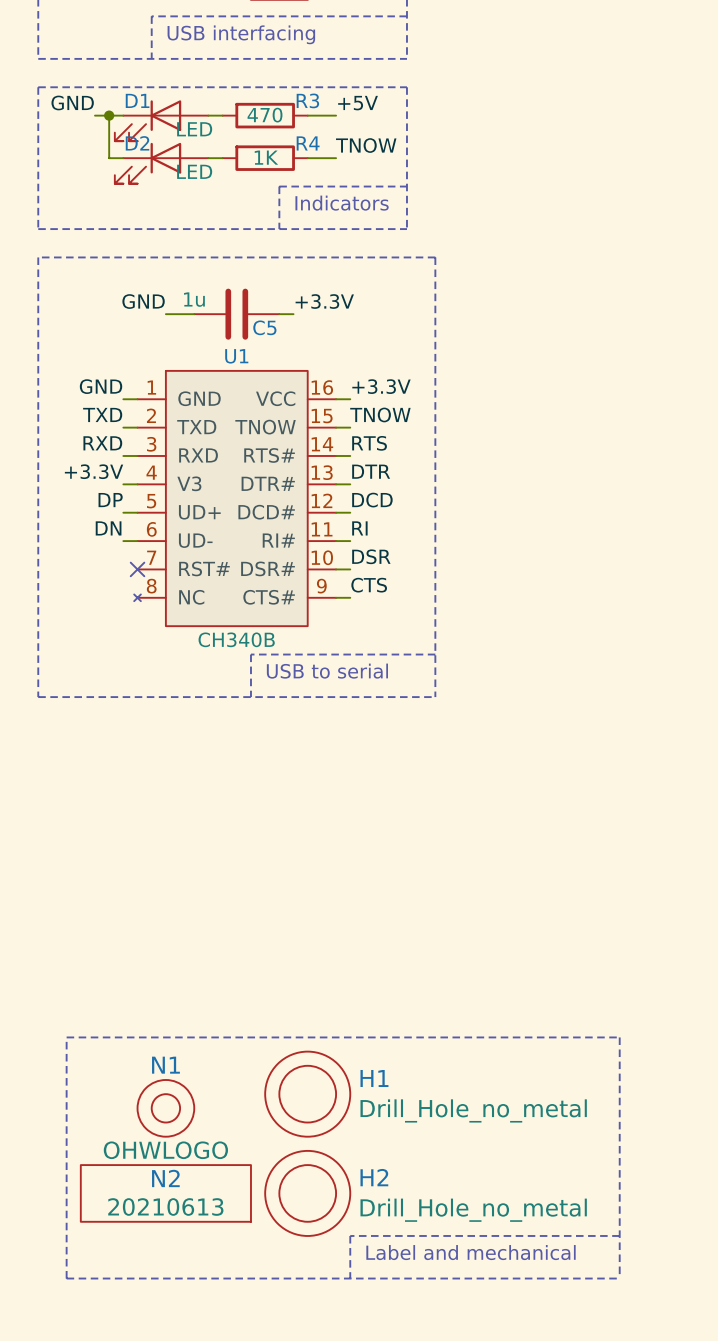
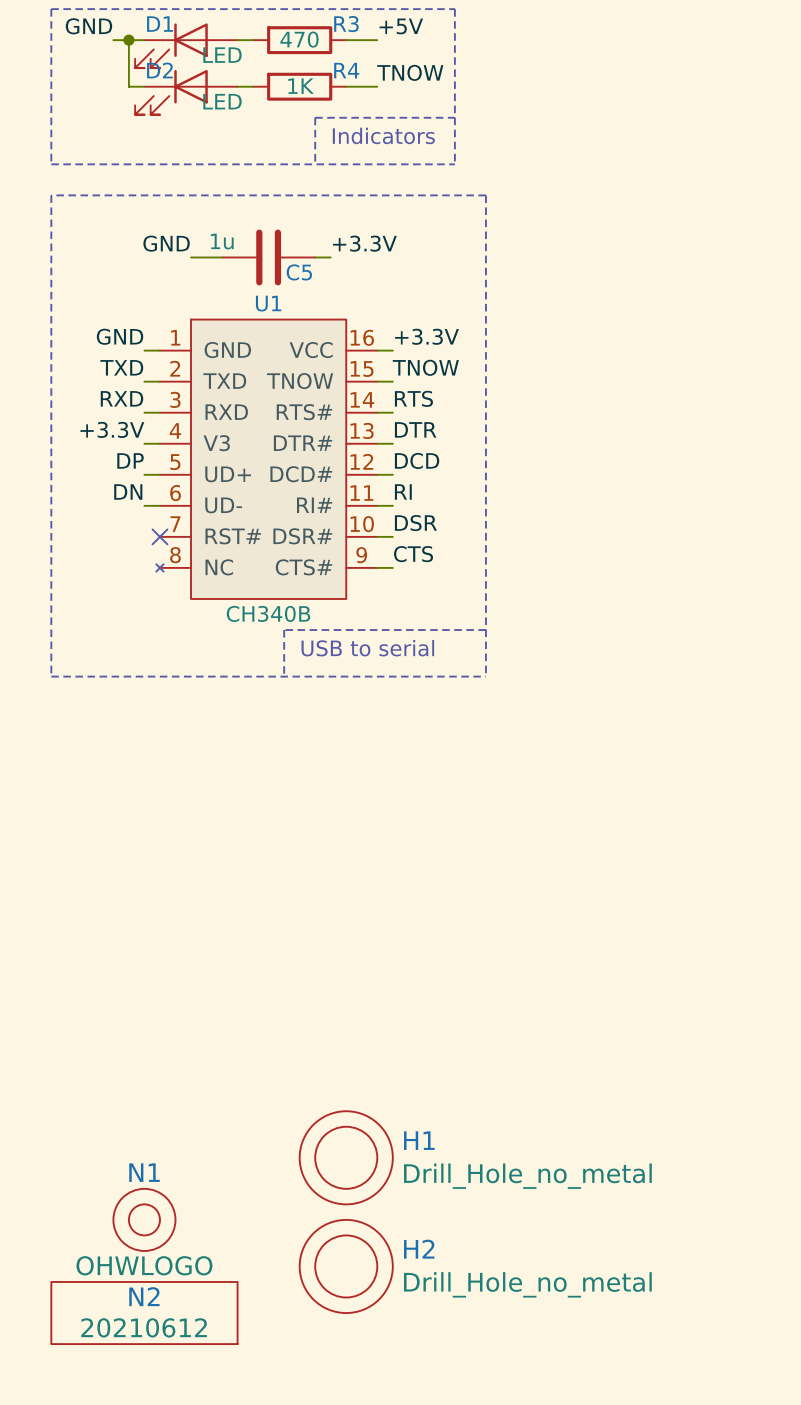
line: (66, 1037) (66, 1278) (619, 1278) (619, 1037) (66, 1037) -> none
H1 position: (307, 1094) -> (346, 1157)
N1 position: (165, 1108) -> (144, 1219)
N2 position: (165, 1193) -> (144, 1313)
H2 position: (307, 1193) -> (346, 1266)
N2 value: 20210613 (165, 1206) -> 20210612 (144, 1327)
line: (619, 1235) (350, 1235) (350, 1278) -> none
text: Label and mechanical (471, 1252) -> none

